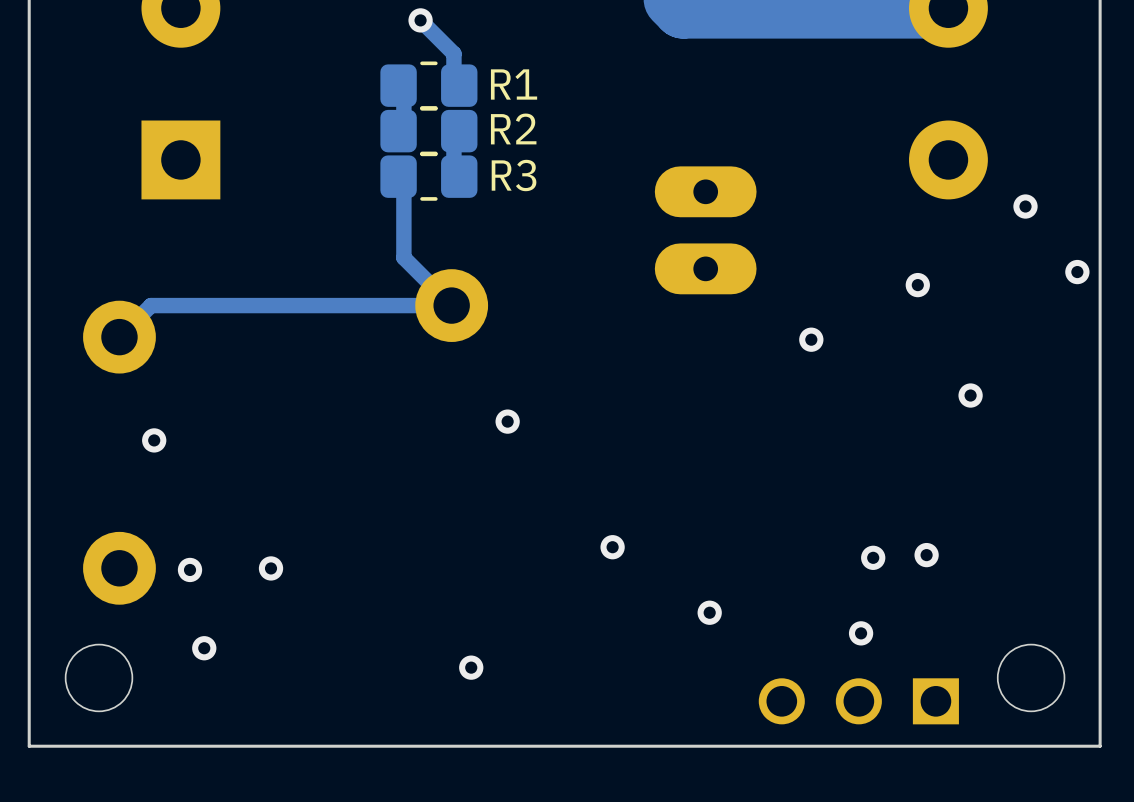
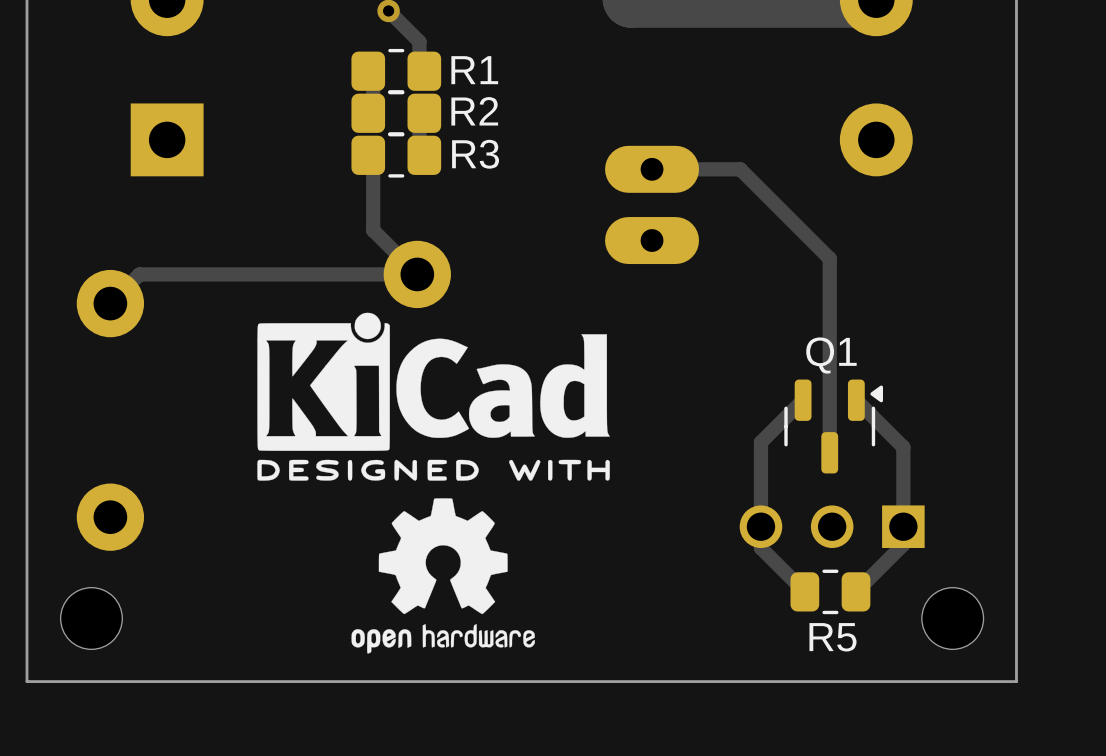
track: none -> (652, 169) (740, 169) (829, 258) (829, 452)
via: (1025, 206) -> none
via: (1077, 272) -> none
via: (917, 285) -> none
via: (811, 339) -> none
drawing: none -> [257, 312, 610, 654]
via: (970, 395) -> none
via: (507, 421) -> none
via: (154, 440) -> none
track: none -> (803, 400) (760, 442) (760, 548) (804, 591)
track: none -> (856, 400) (903, 447) (903, 544) (856, 591)
Q1: none -> (833, 426)
via: (612, 547) -> none
via: (926, 555) -> none
via: (873, 557) -> none
via: (271, 568) -> none
via: (190, 569) -> none
via: (709, 612) -> none
via: (861, 633) -> none
via: (204, 648) -> none
R5: none -> (830, 591)
via: (471, 667) -> none
part position: (858, 701) -> (832, 526)

